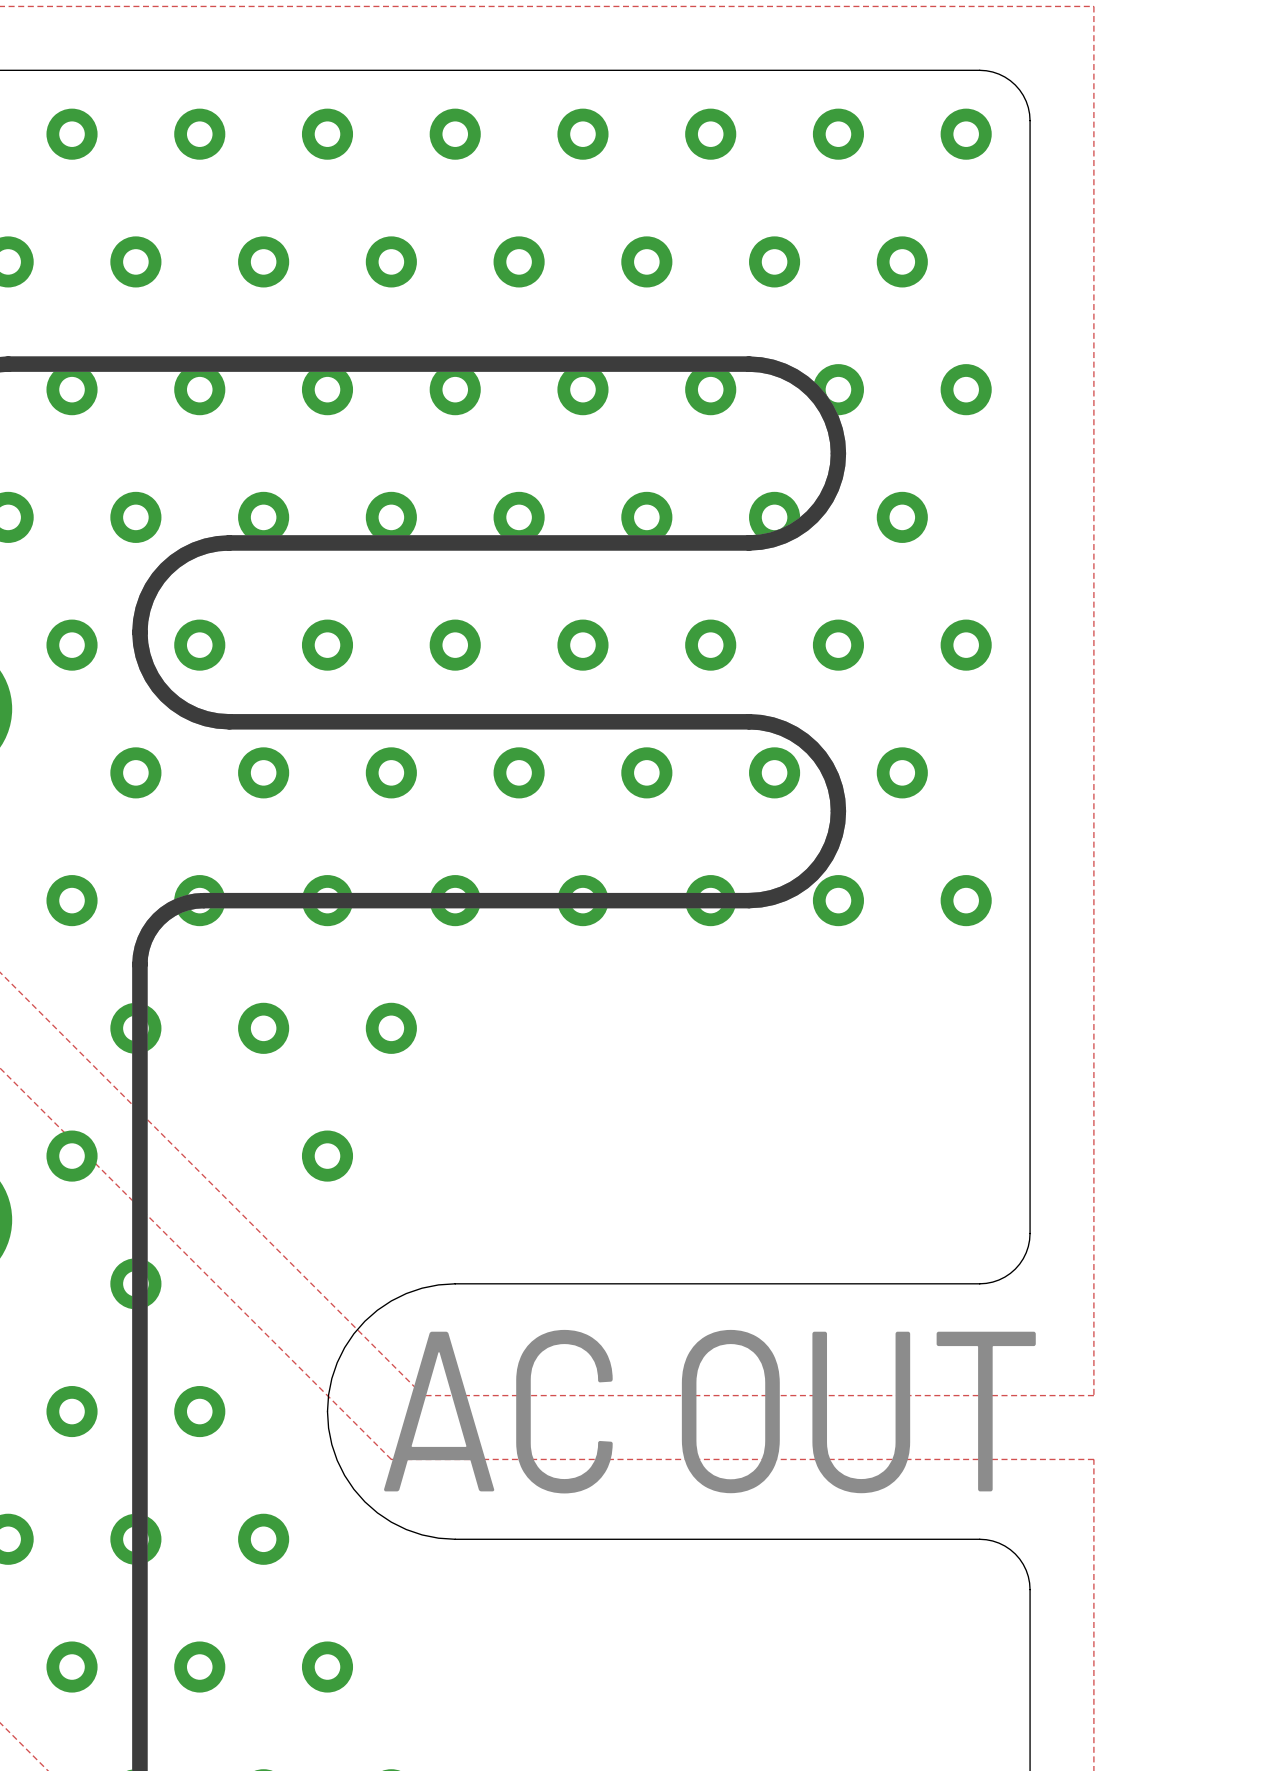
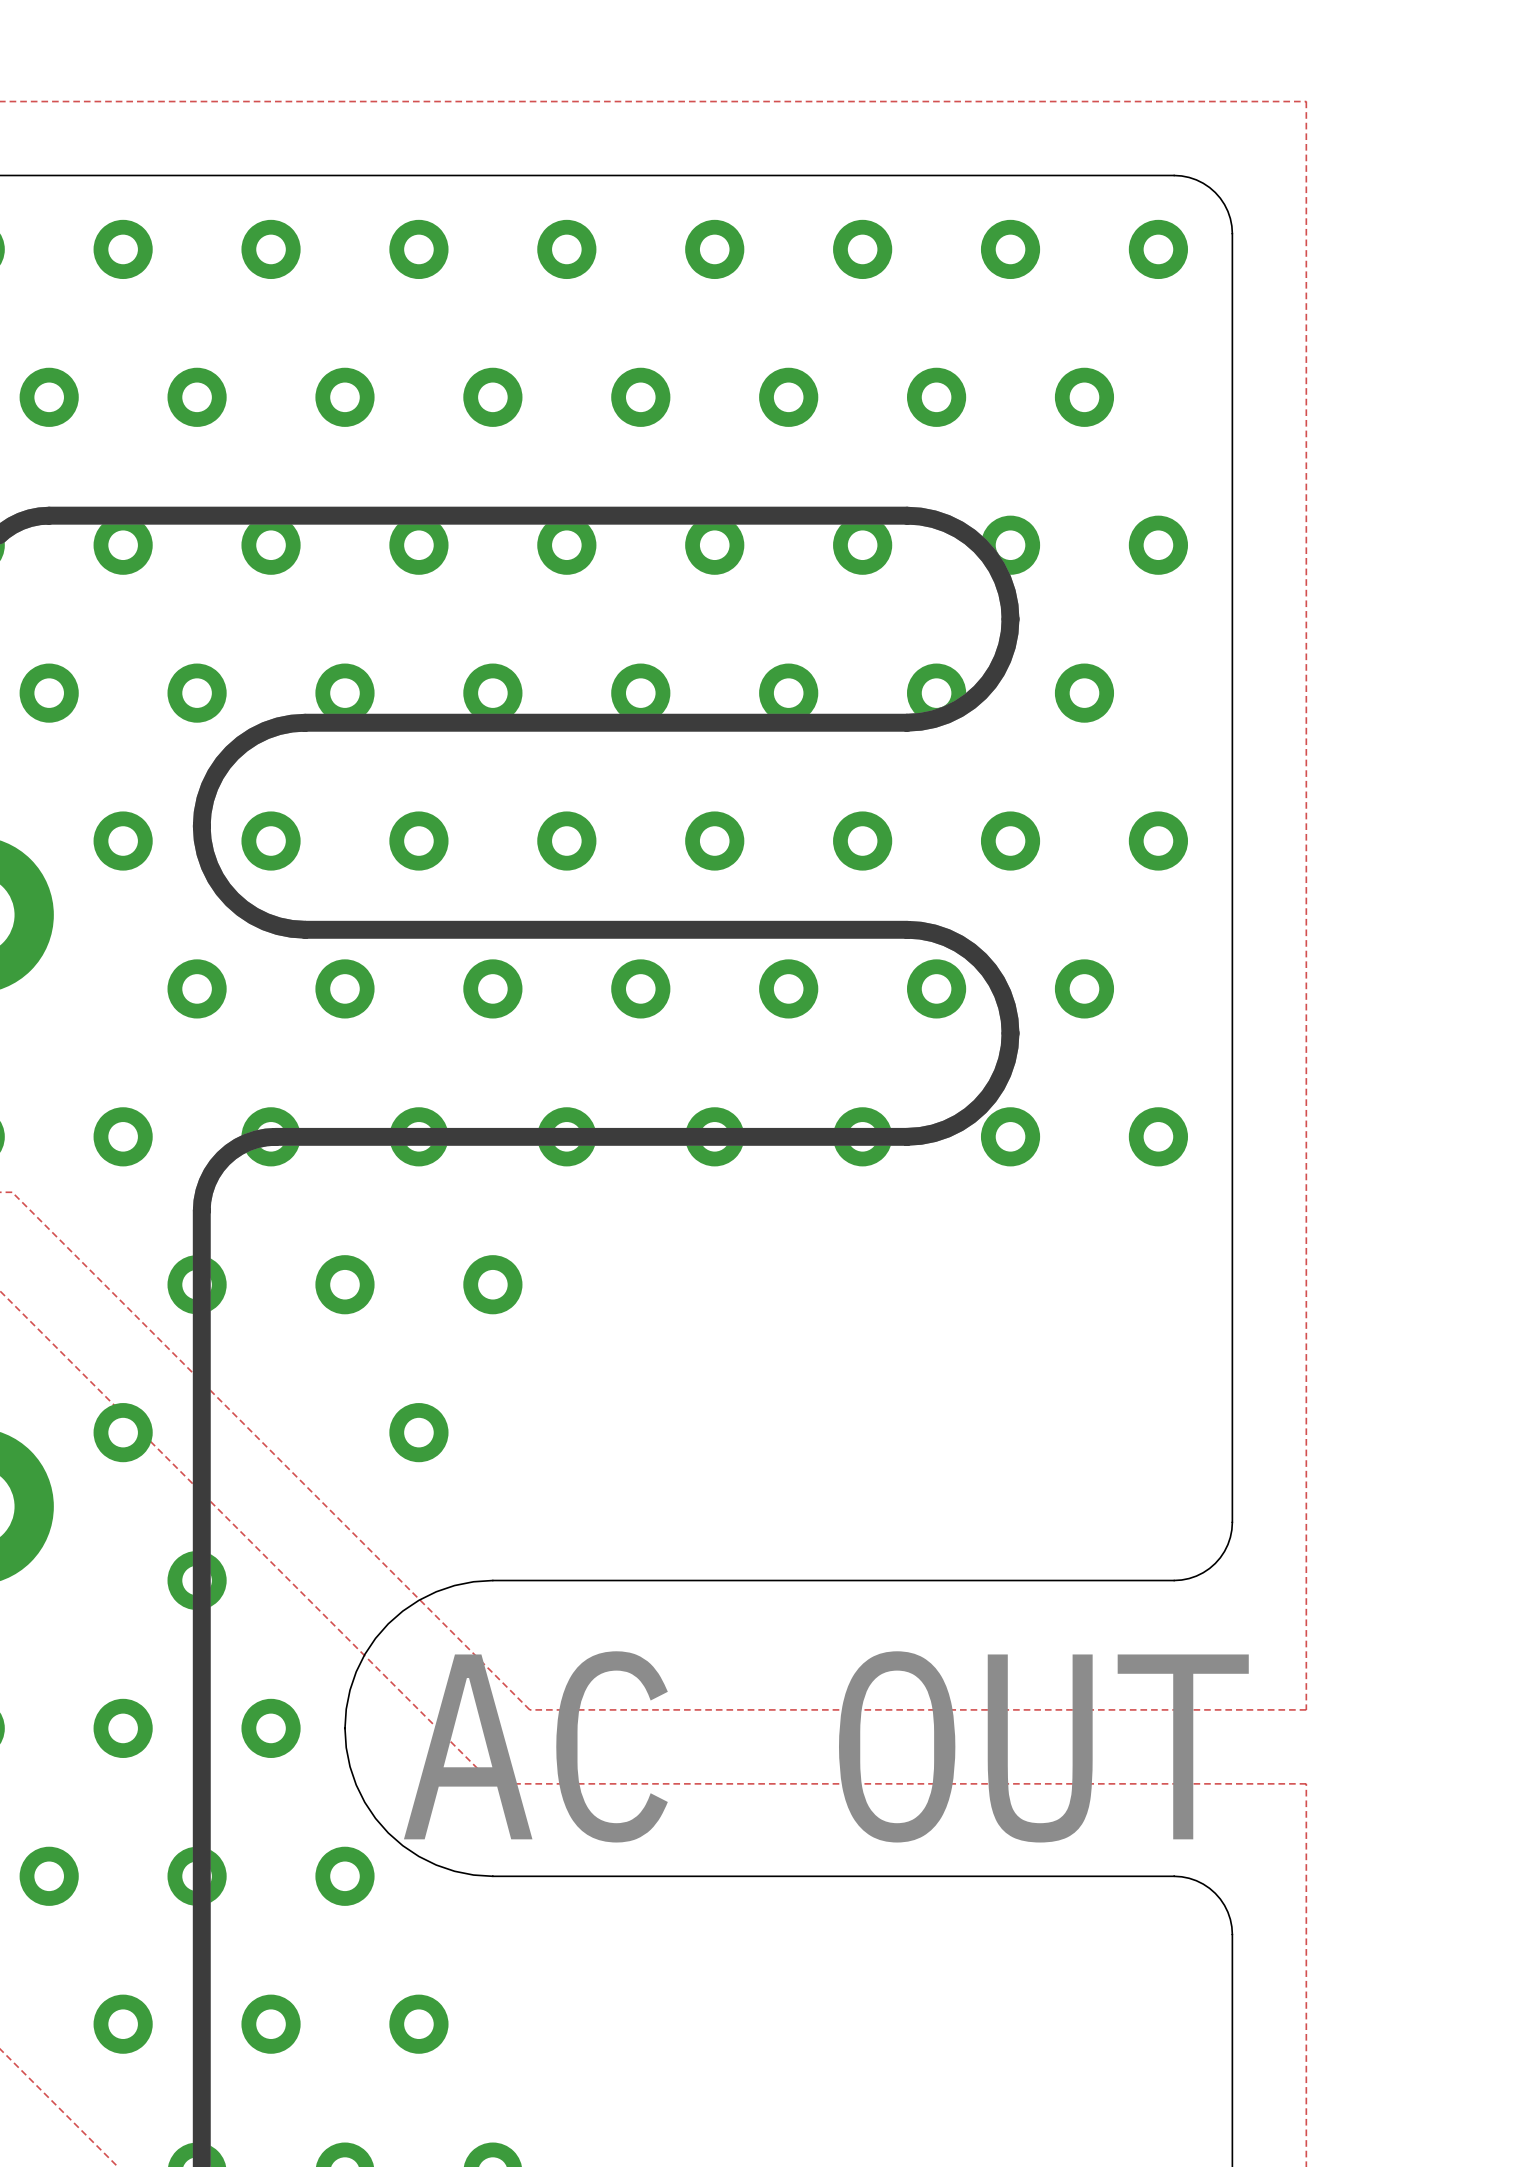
board edge: (455, 1283) (422, 1288) (406, 1293) (377, 1310) (364, 1321) (353, 1333) (337, 1362) (331, 1378) (327, 1411) (331, 1444) (337, 1460) (353, 1489) (364, 1501) (377, 1512) (406, 1529) (422, 1534) (455, 1539) -> (566, 1580) (473, 1581) (454, 1585) (418, 1600) (388, 1623) (364, 1654) (350, 1690) (344, 1728) (350, 1766) (364, 1802) (388, 1832) (418, 1856) (454, 1871) (473, 1875) (566, 1876)
text position: AC OUT (709, 1411) -> AC OUT (826, 1746)

